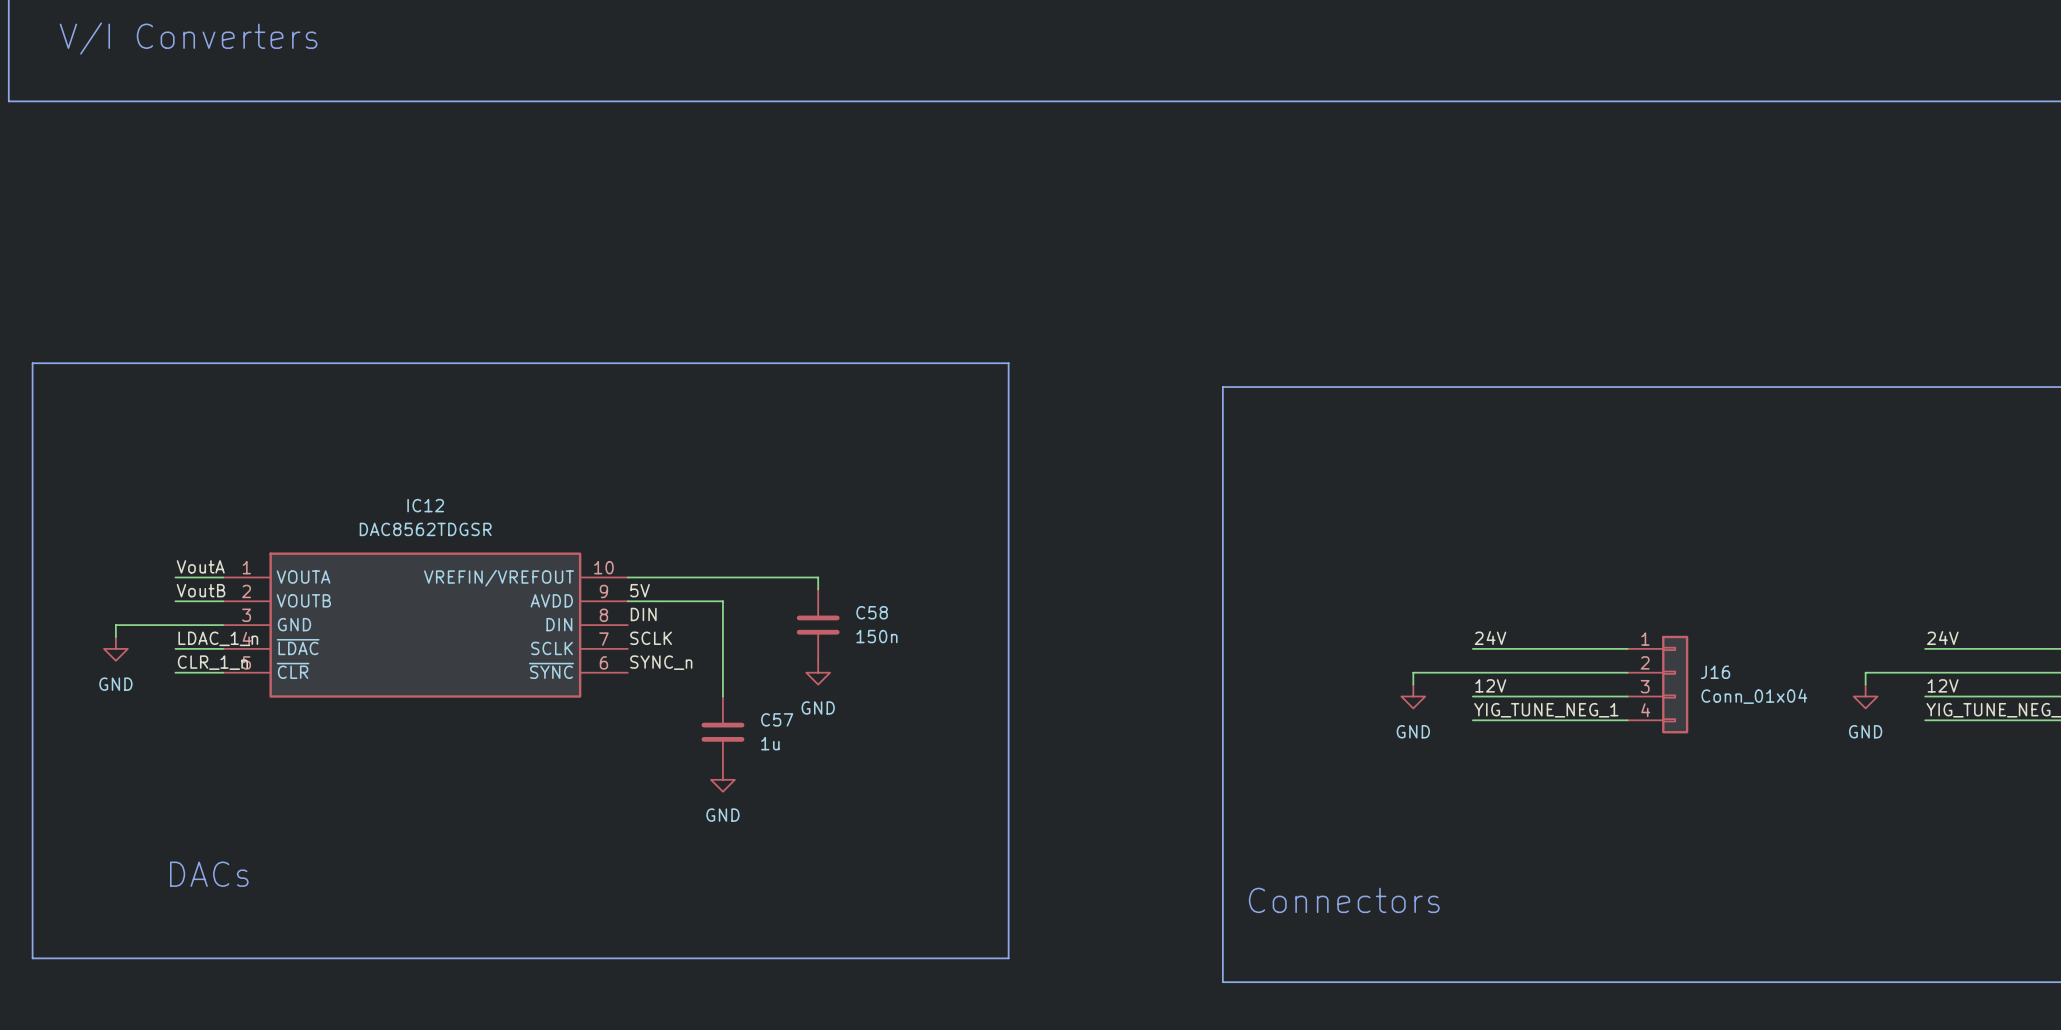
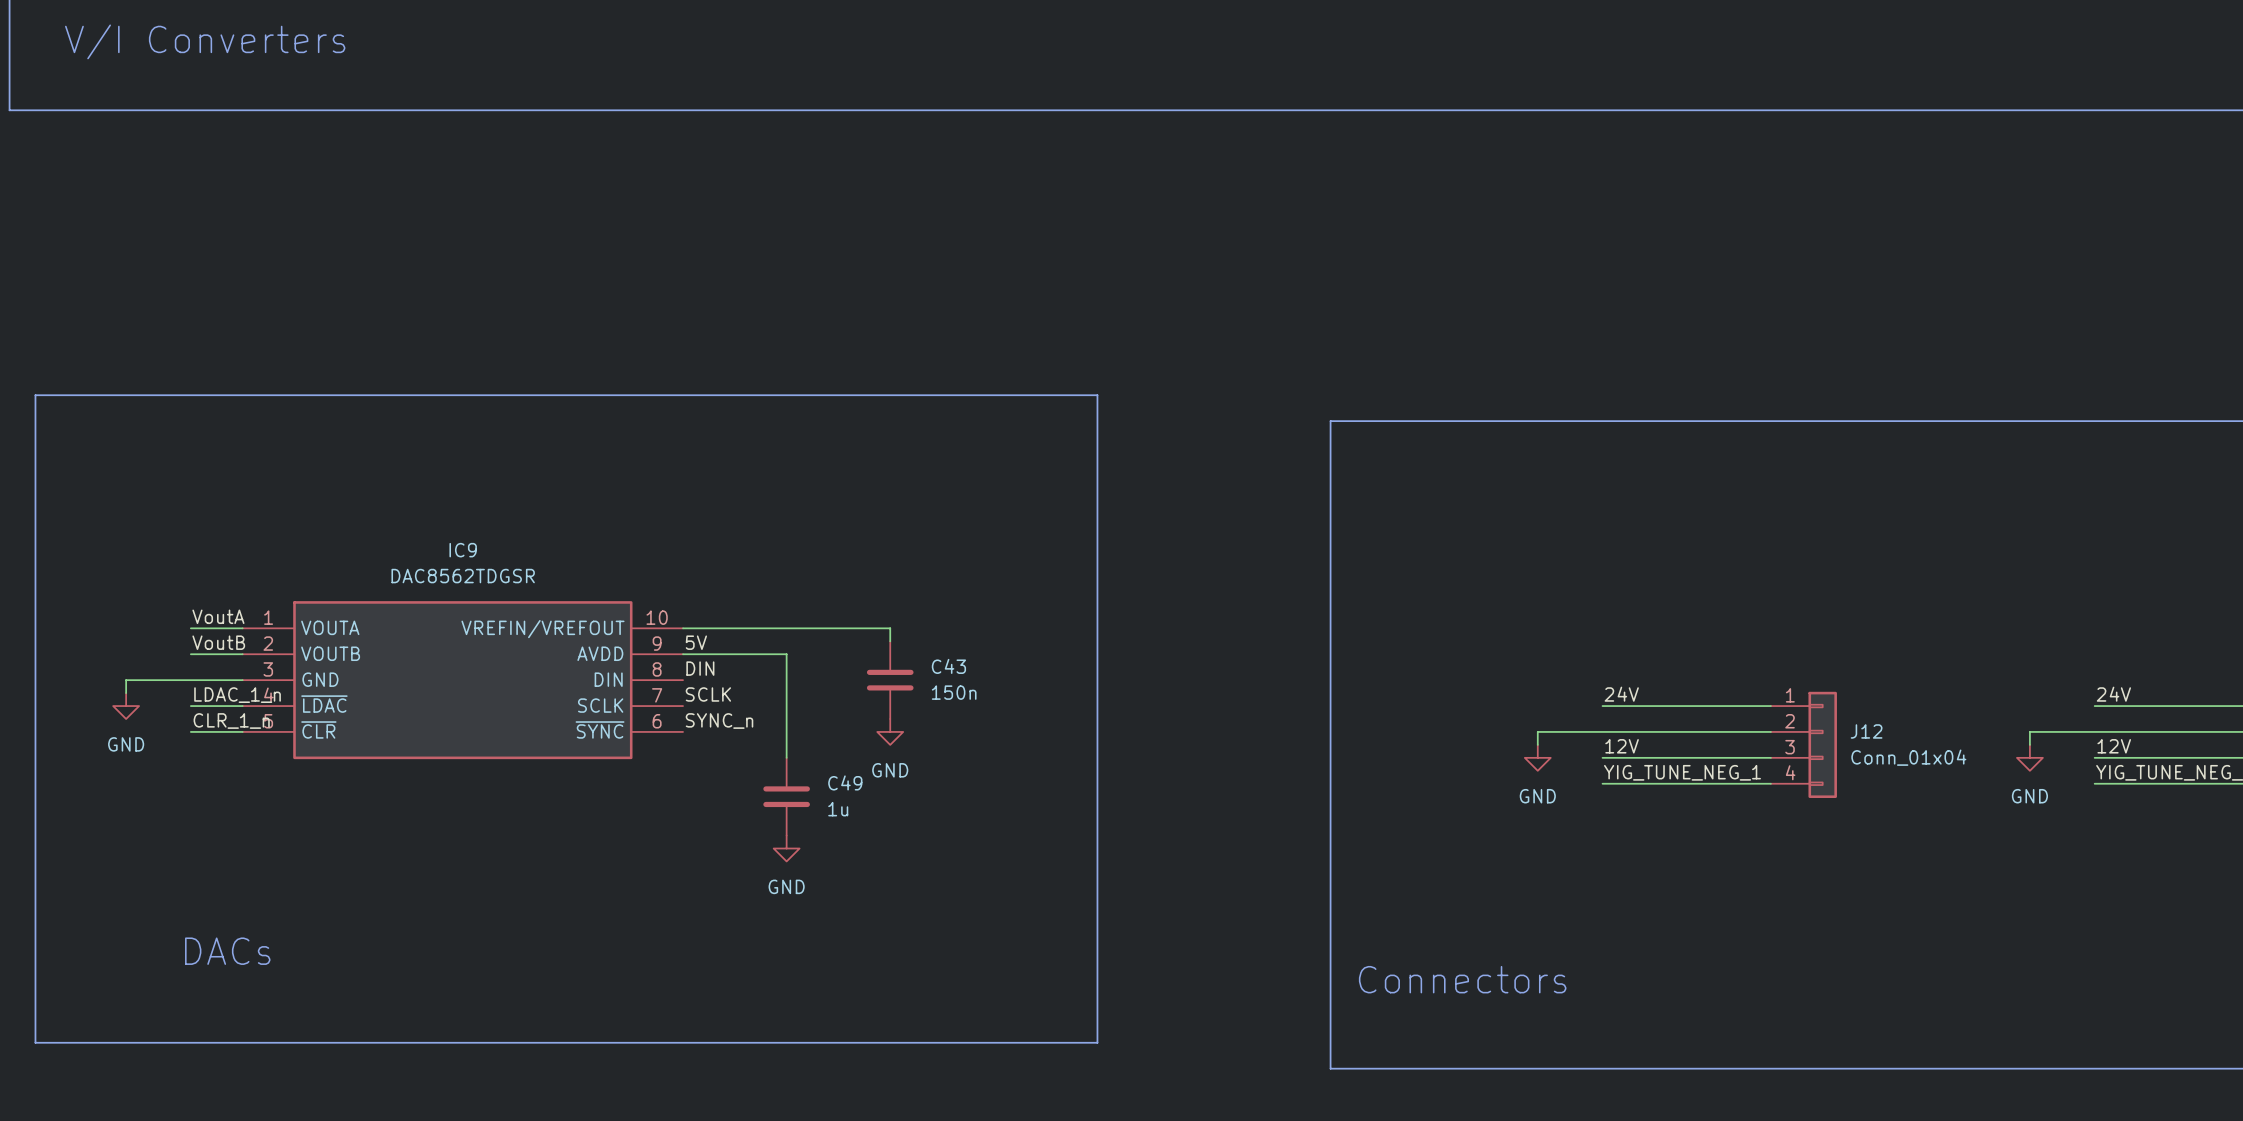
IC12 name: IC12 (425, 505) -> IC9 (463, 550)
C58 name: C58 (872, 612) -> C43 (948, 666)
J16 name: J16 (1715, 672) -> J12 (1866, 731)
C57 name: C57 (777, 719) -> C49 (845, 782)

